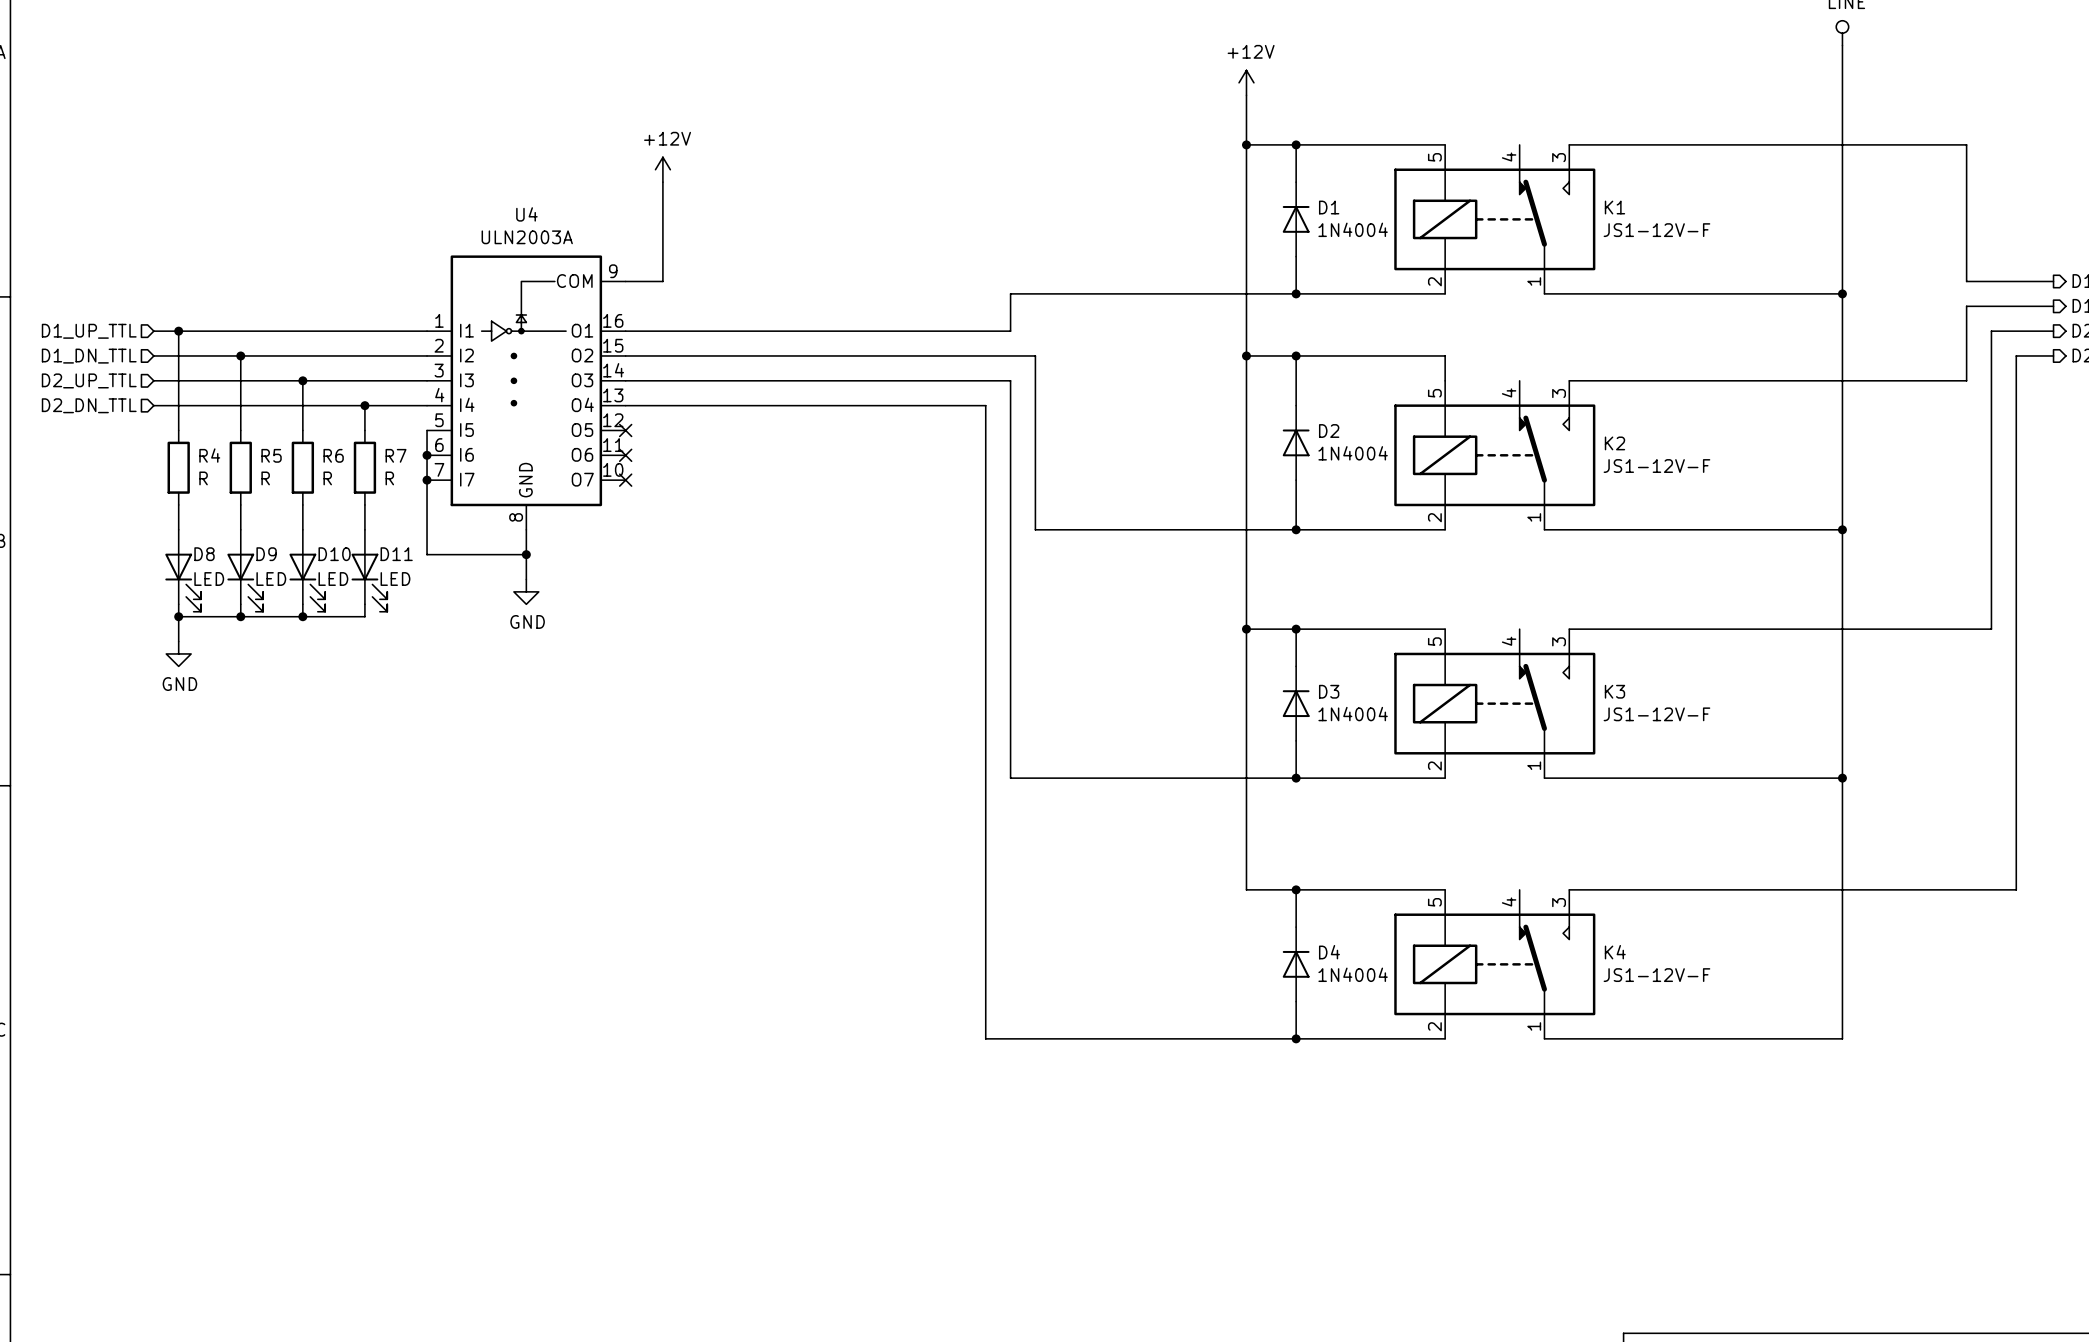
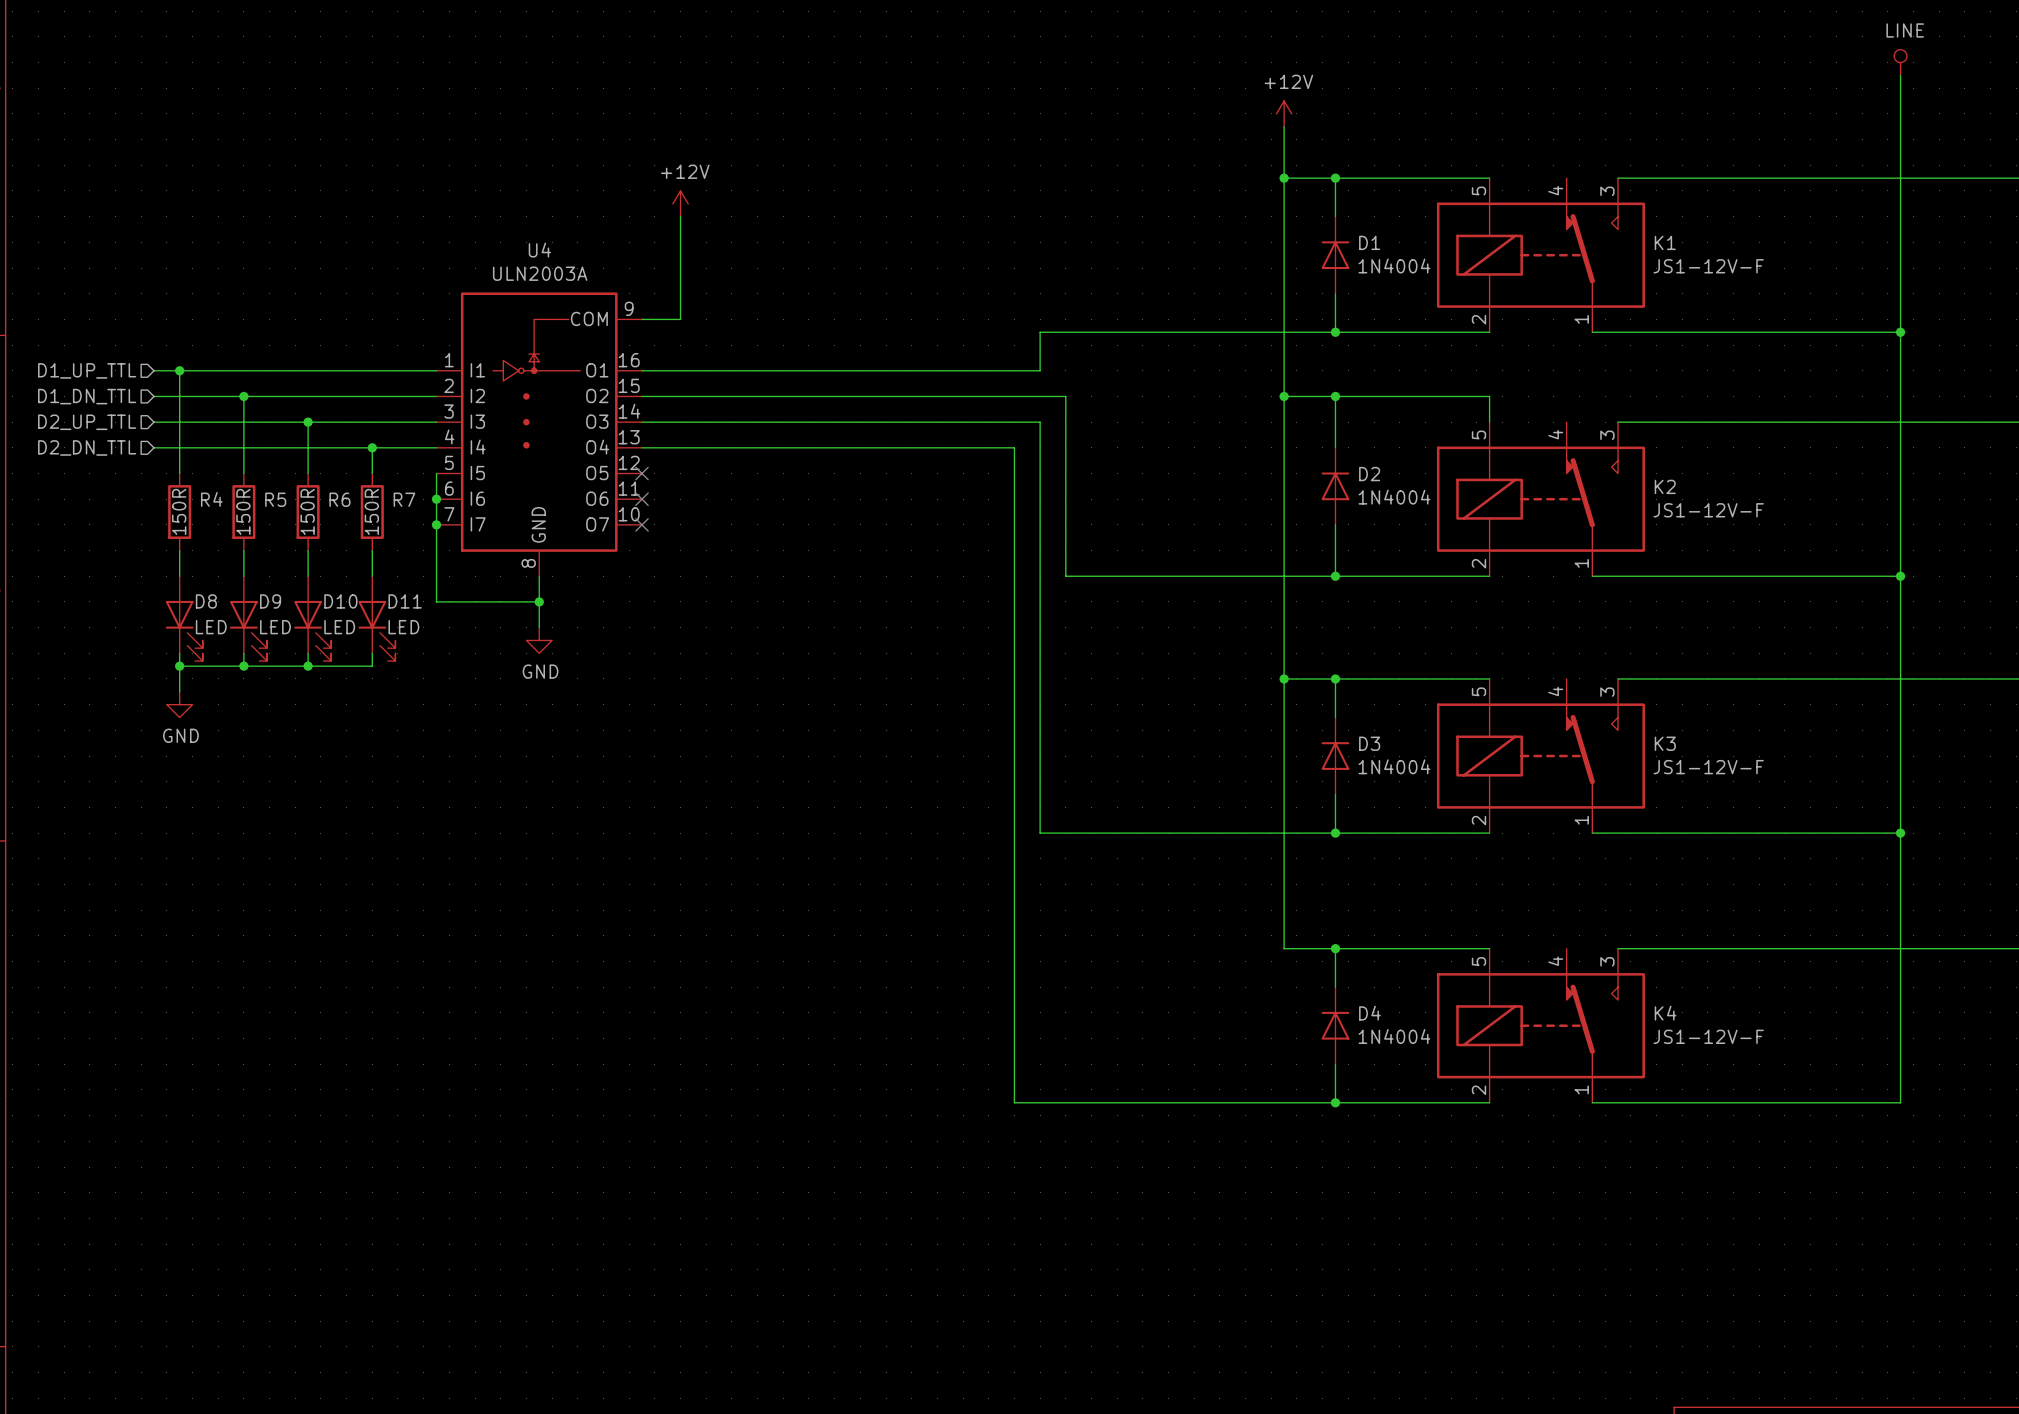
R4 value: R (203, 478) -> 150R (179, 511)
R5 value: R (265, 478) -> 150R (243, 511)
R6 value: R (327, 478) -> 150R (307, 511)
R7 value: R (389, 478) -> 150R (371, 511)

